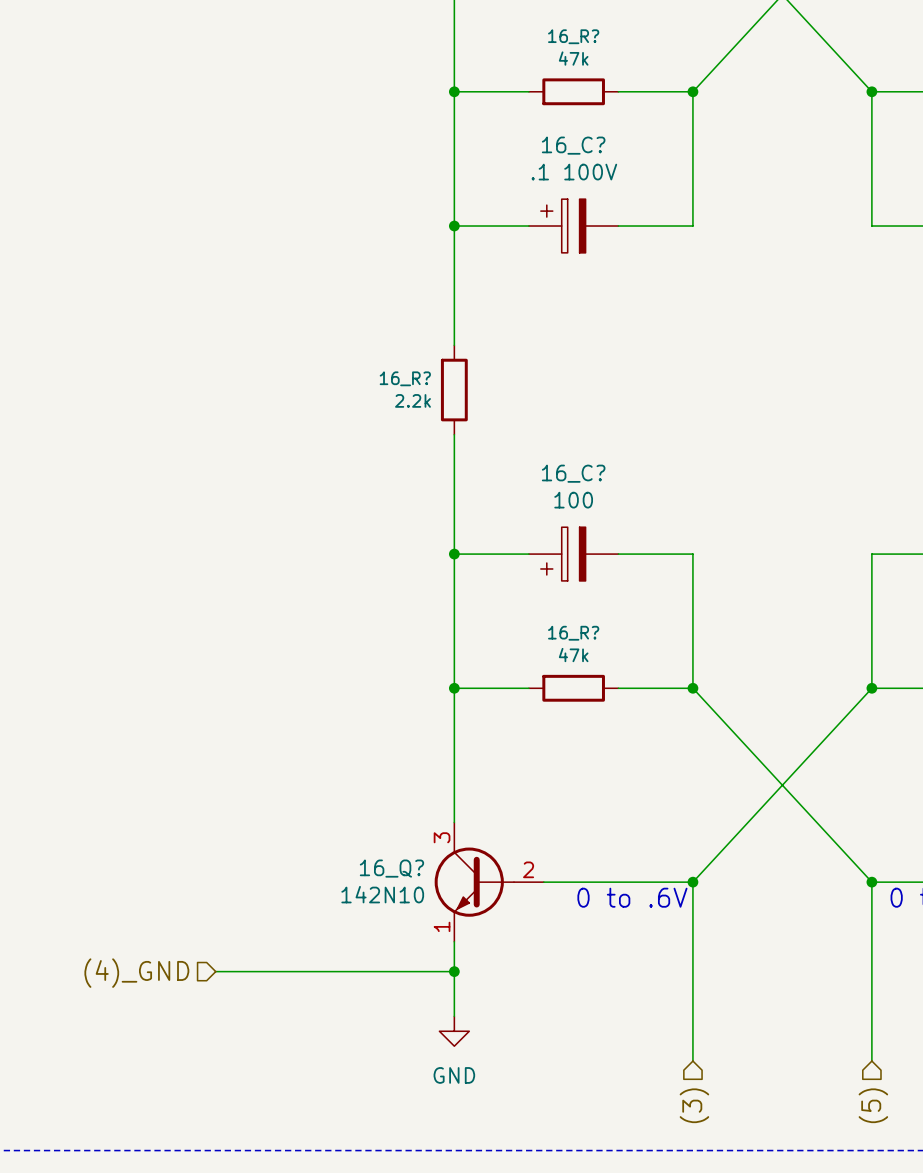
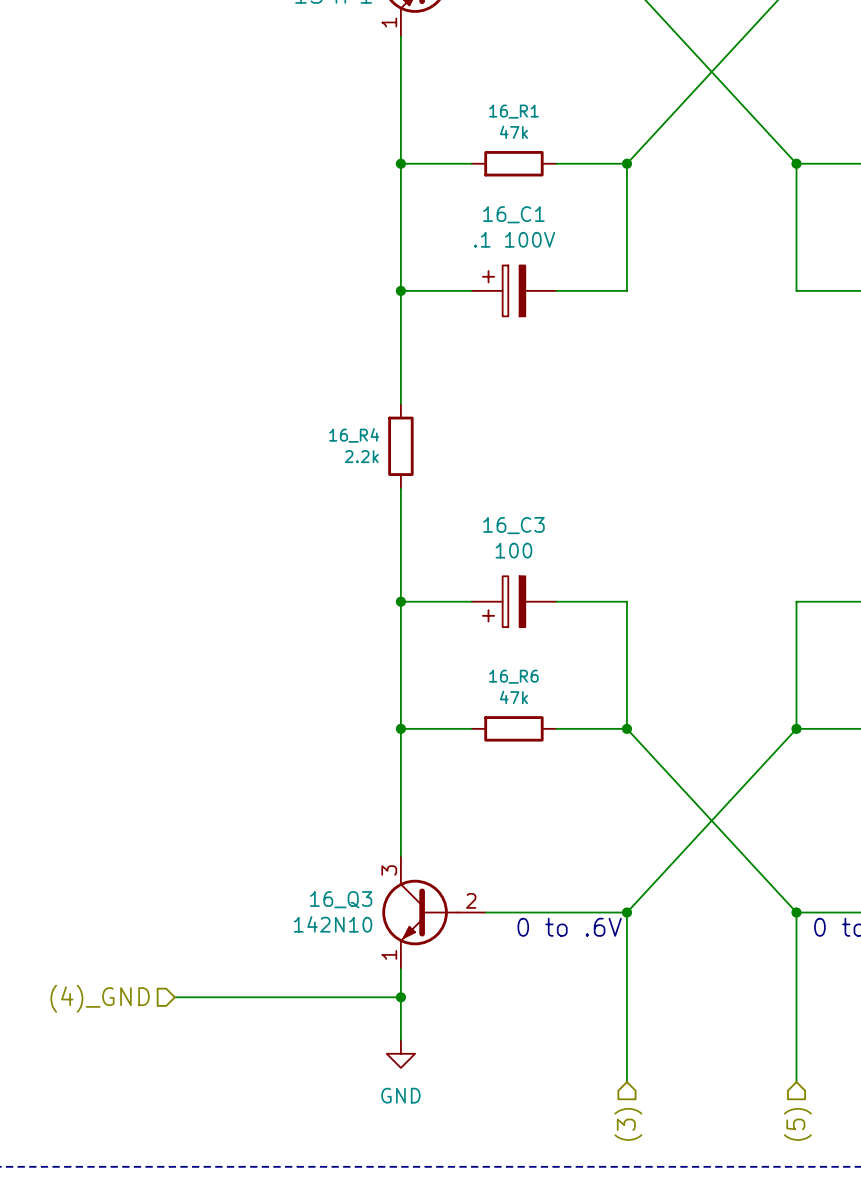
16_R? name: 16_R? (573, 36) -> 16_R1 (513, 111)
16_C? name: 16_C? (573, 145) -> 16_C1 (513, 214)
16_R? name: 16_R? (405, 378) -> 16_R4 (354, 435)
16_C? name: 16_C? (573, 473) -> 16_C3 (513, 525)
16_R? name: 16_R? (573, 633) -> 16_R6 (513, 676)
16_Q? name: 16_Q? (391, 868) -> 16_Q3 (341, 899)

